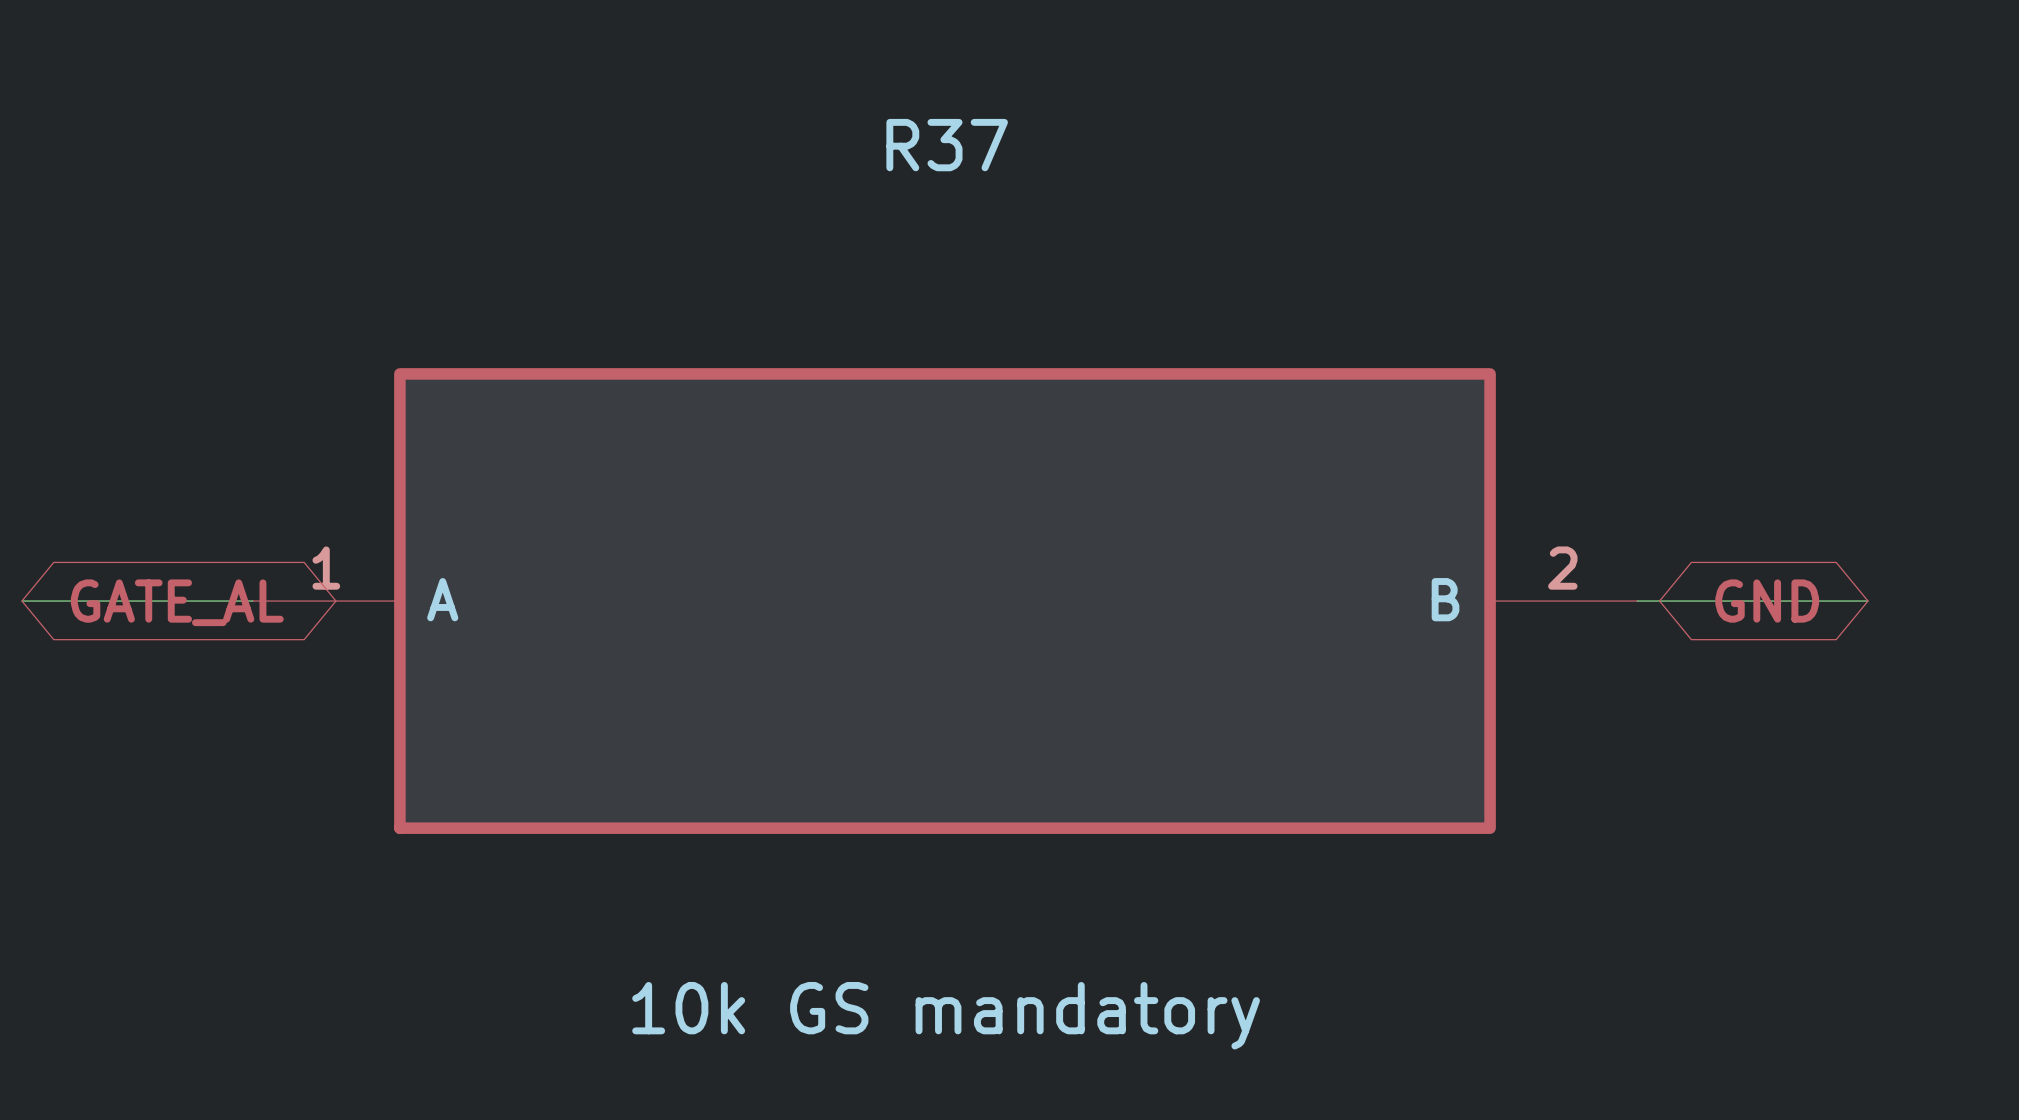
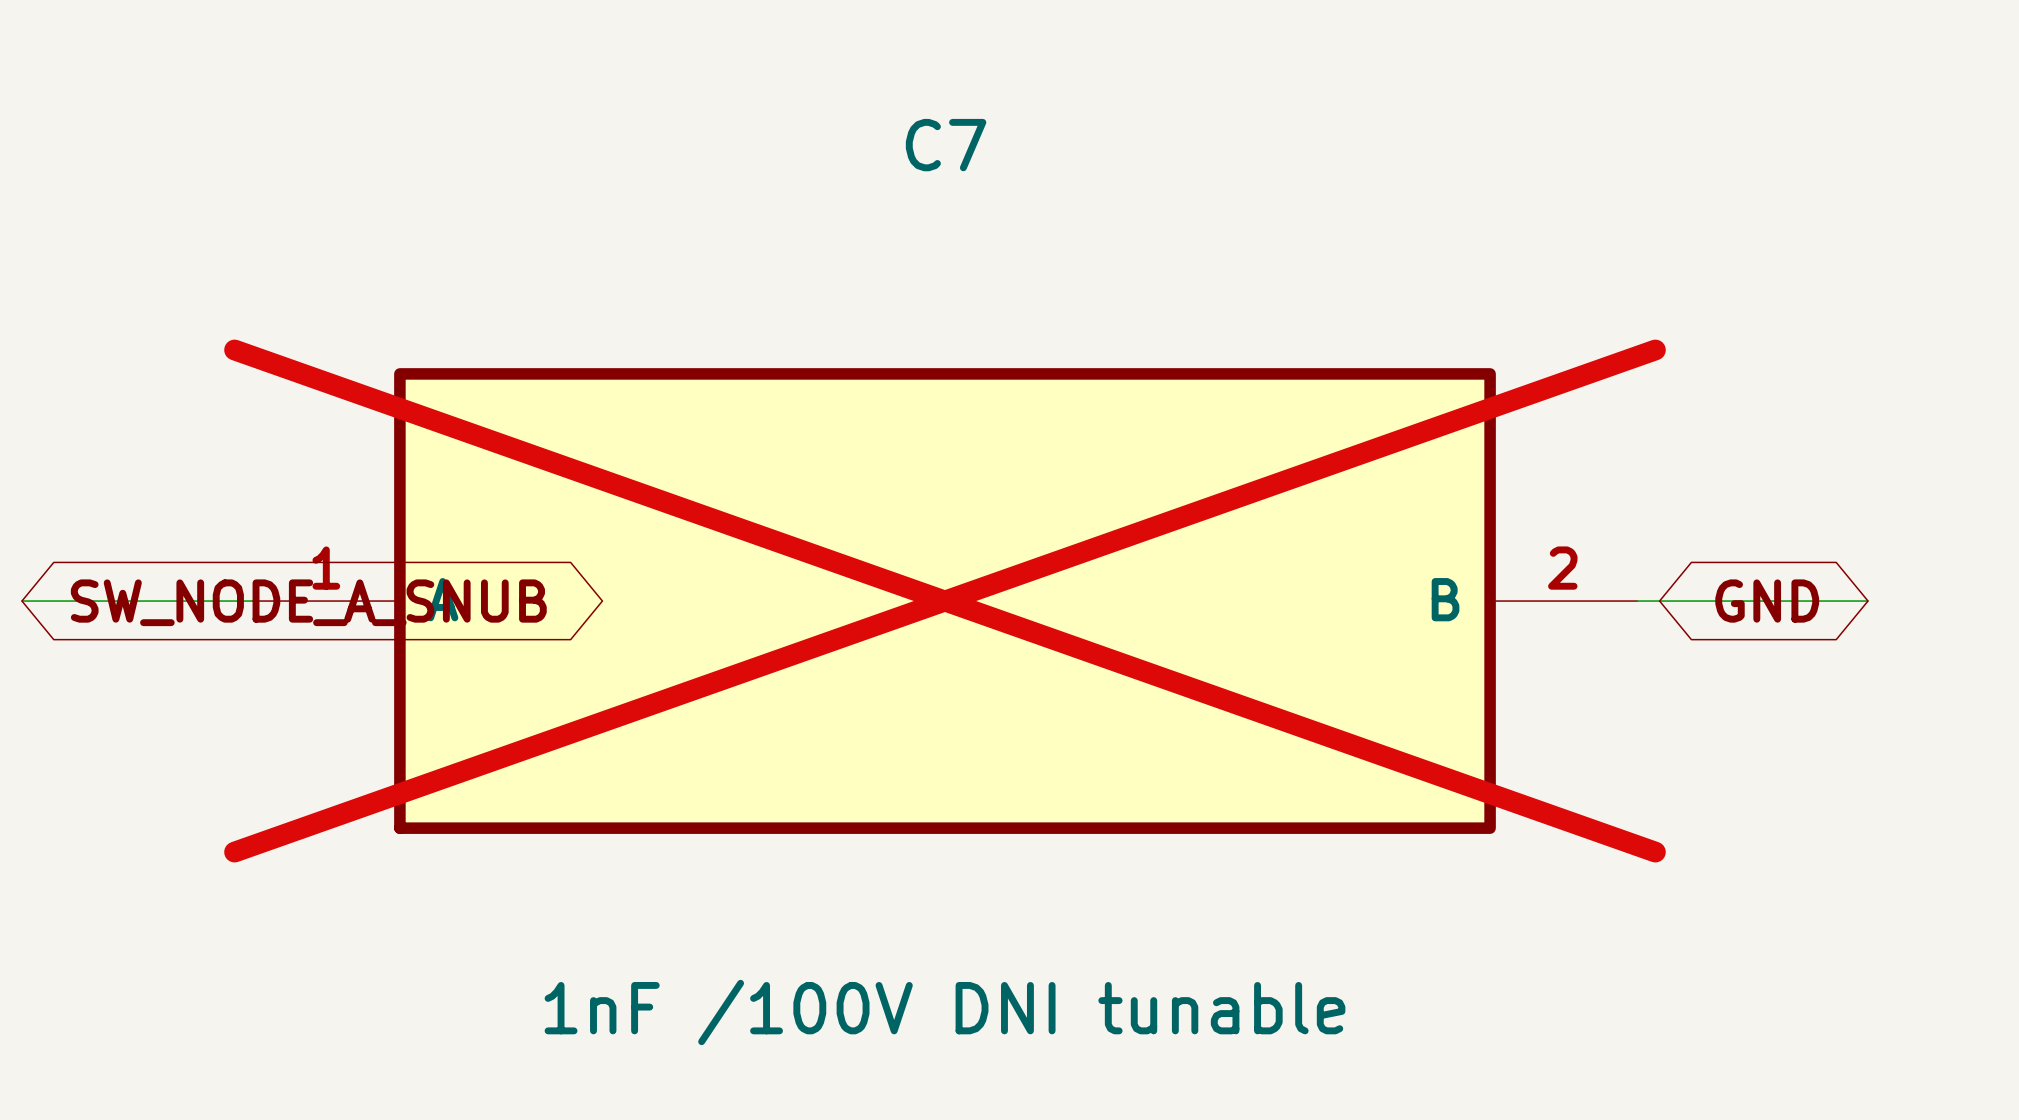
R37 name: R37 (947, 145) -> C7 (946, 145)
R37 do-not-place cross: none -> (944, 601)
global label: GATE_AL (177, 602) -> SW_NODE_A_SNUB (308, 602)
R37 value: 10k GS mandatory (946, 1015) -> 1nF /100V DNI tunable (944, 1012)

